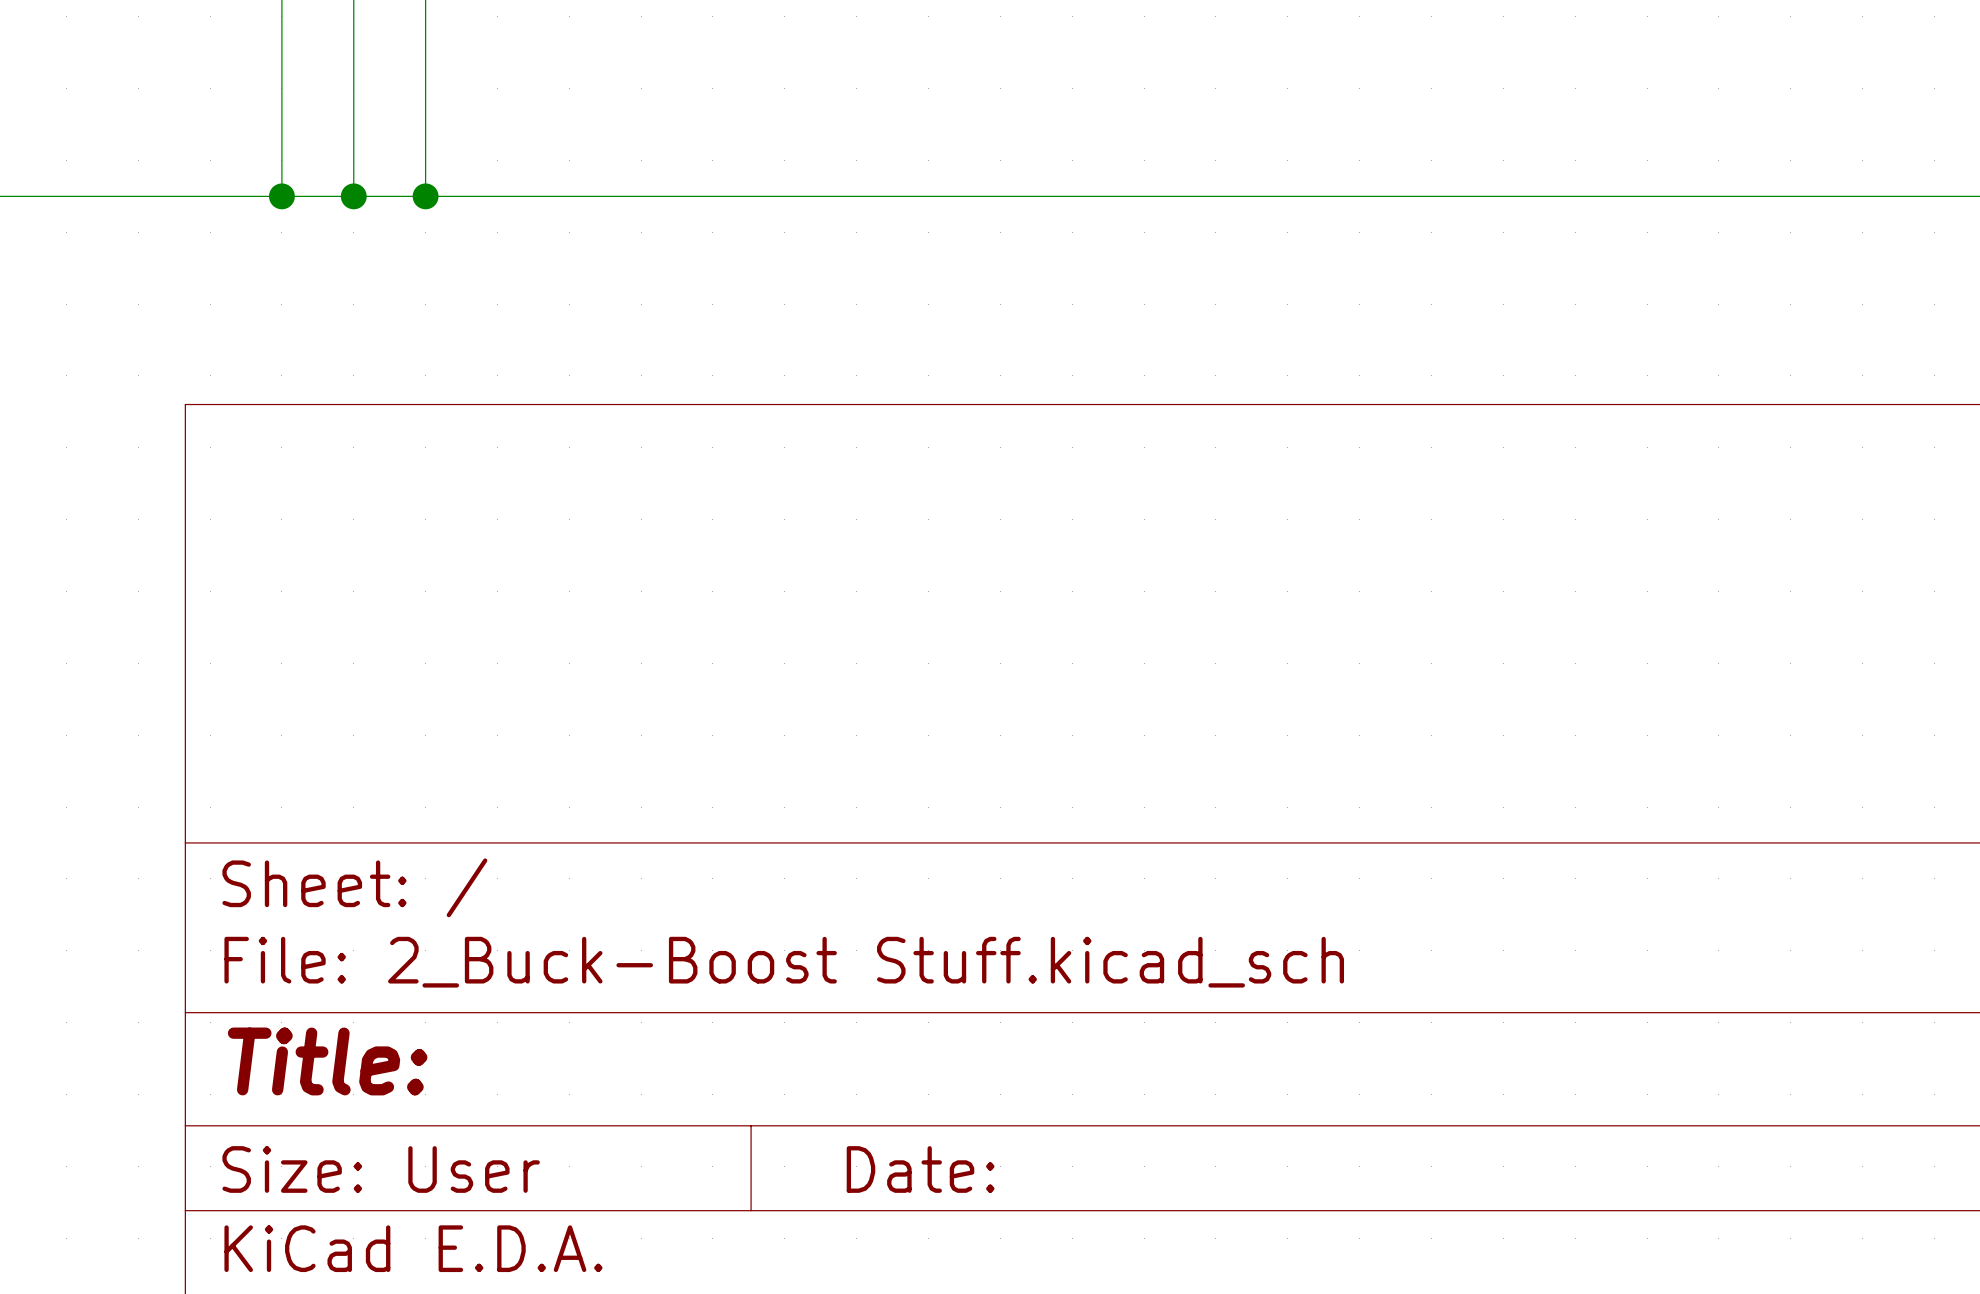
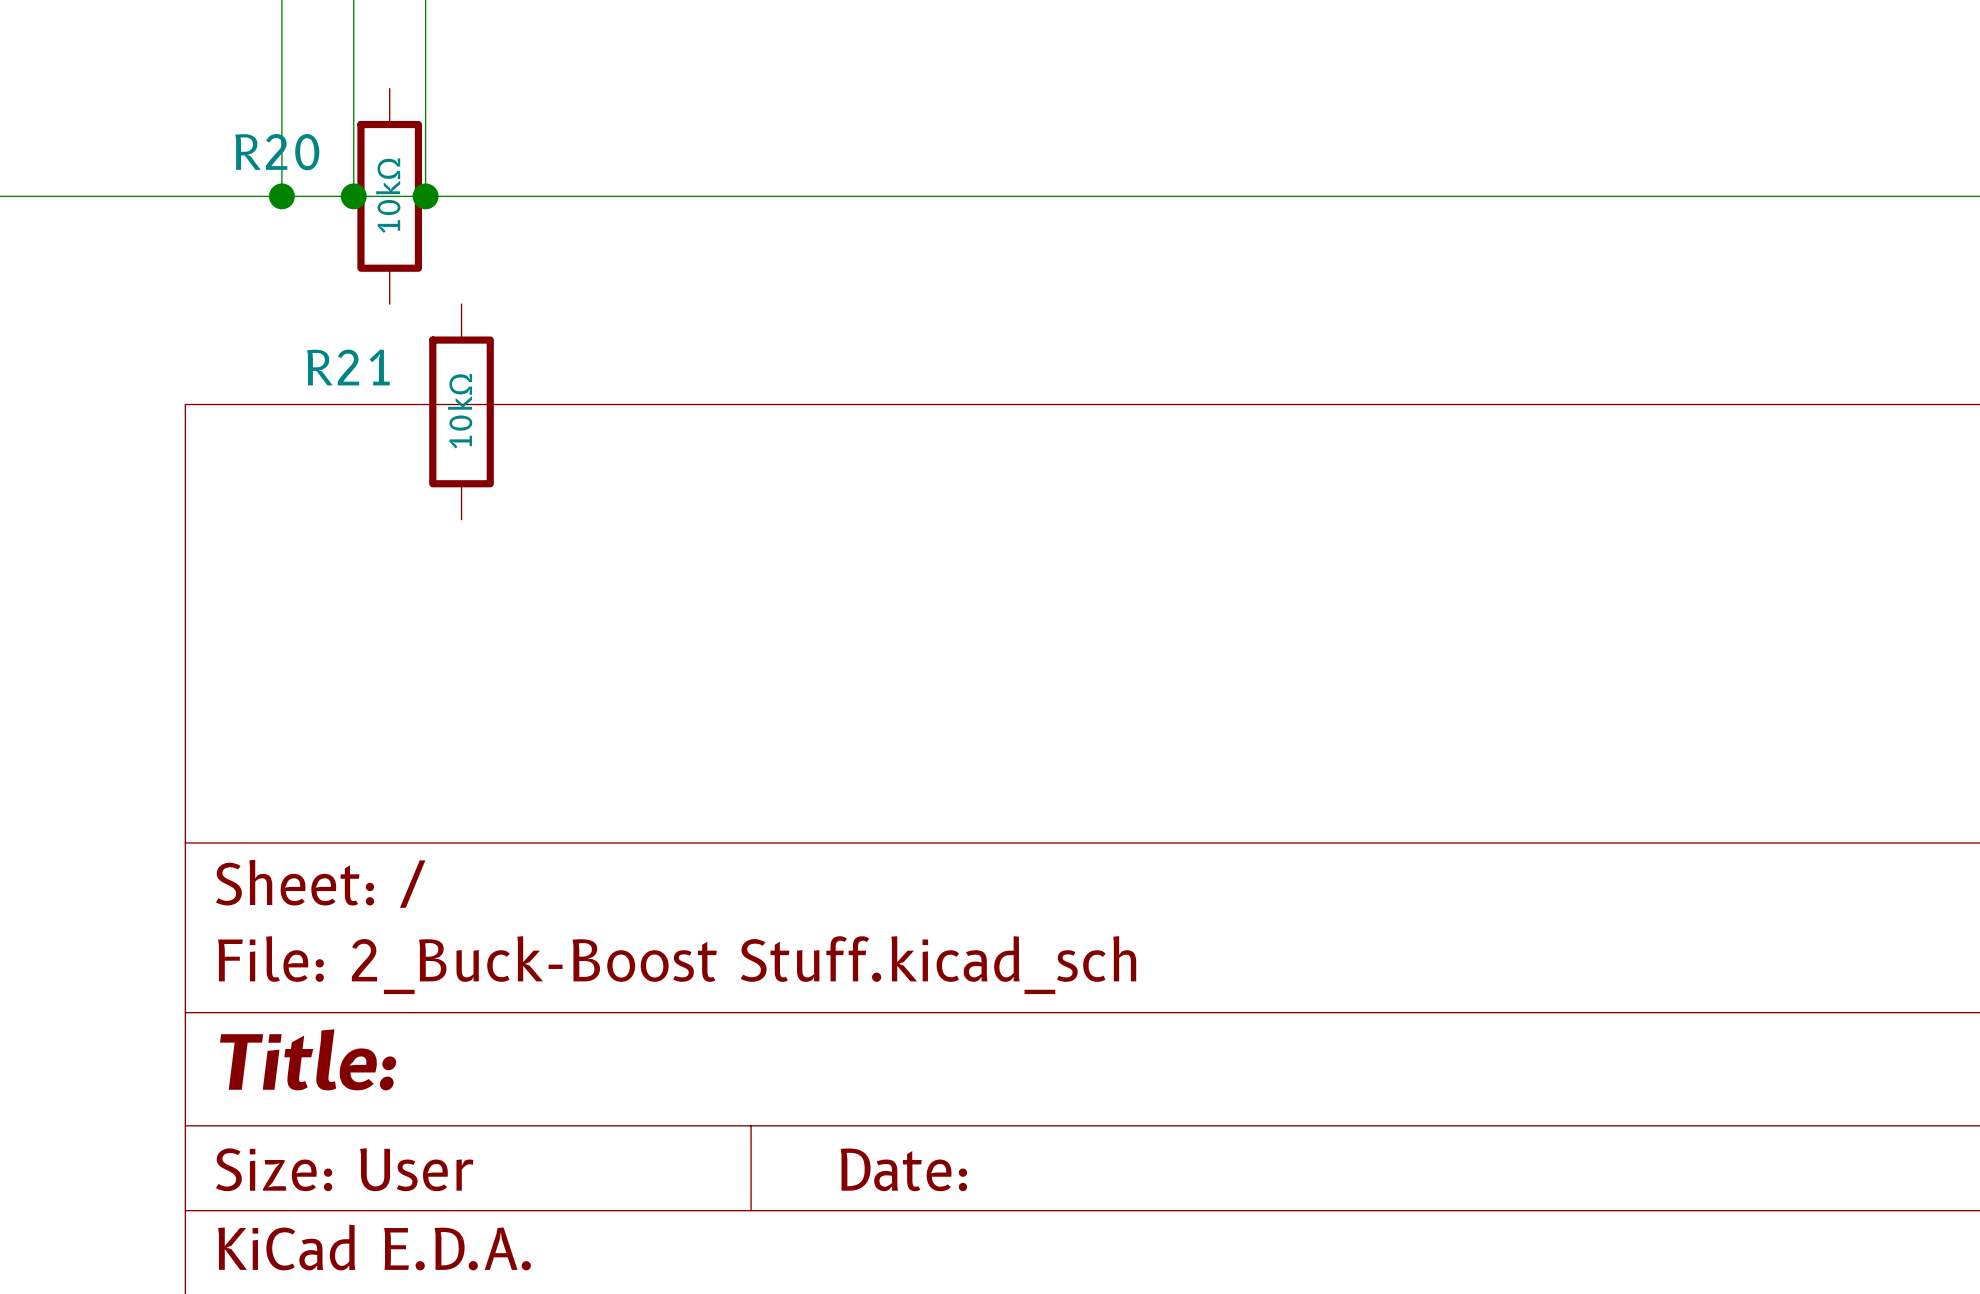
R20: none -> 10kΩ (389, 196)
R21: none -> 10kΩ (461, 411)

